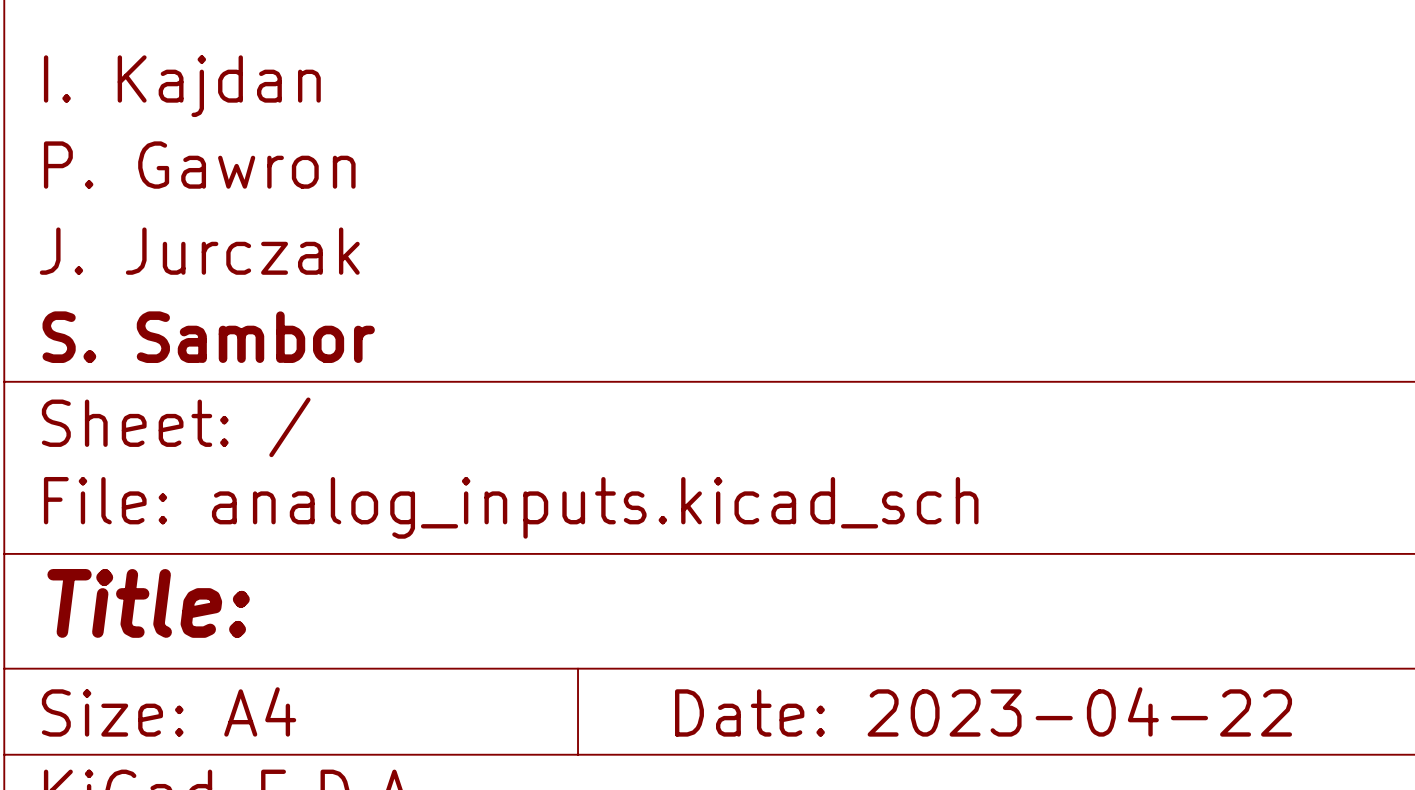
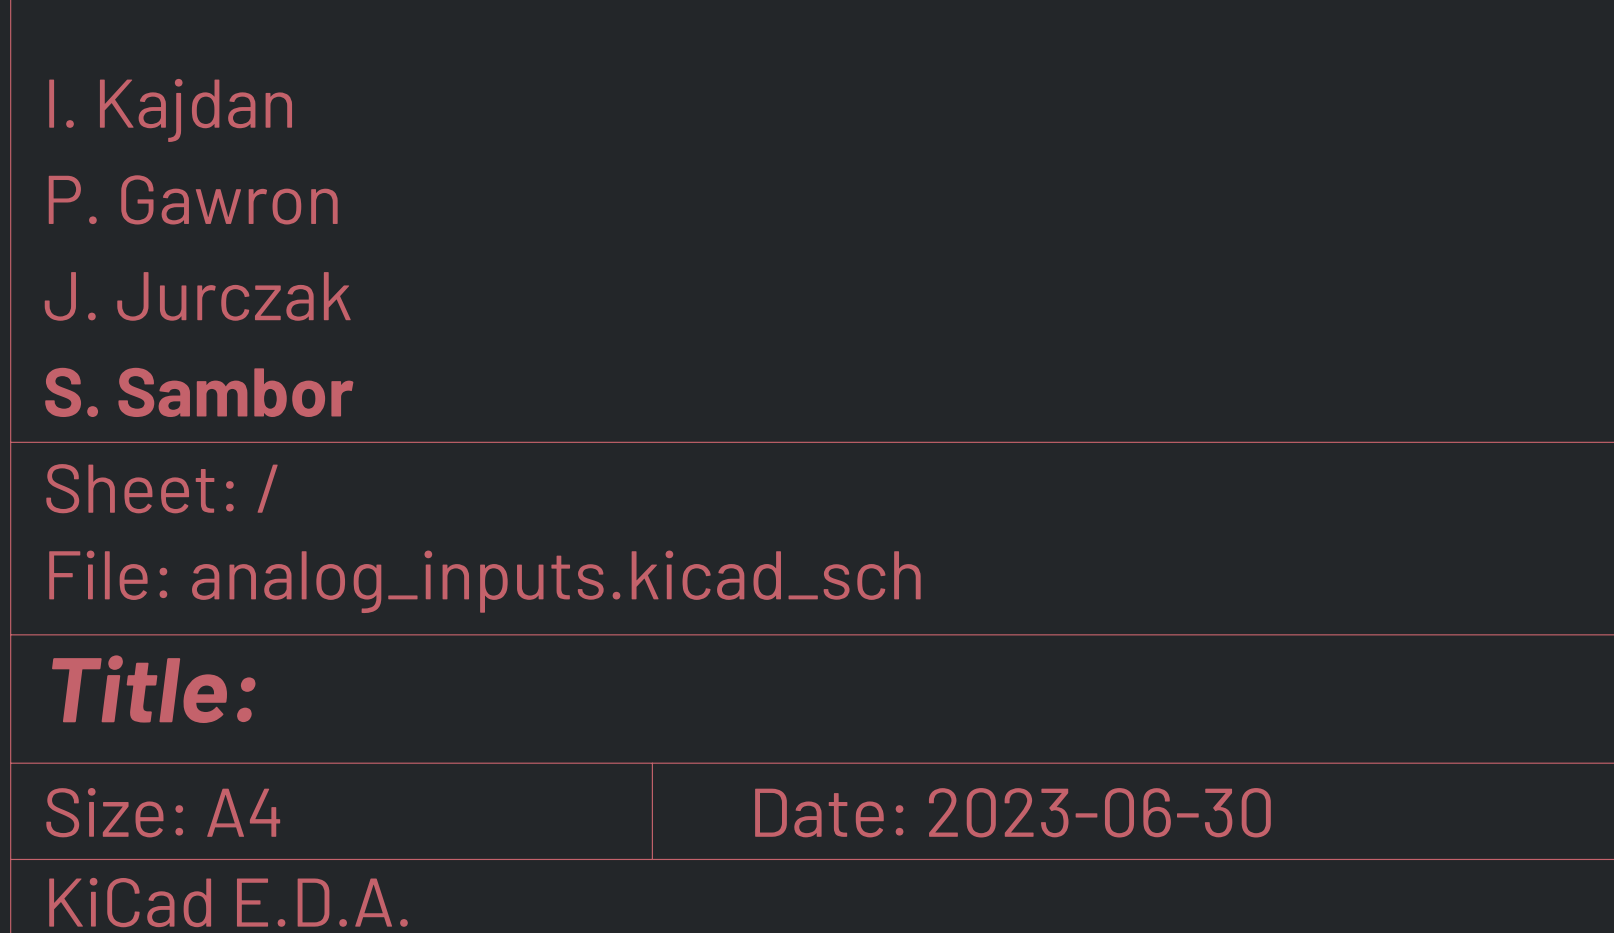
title block: Date: 2023-04-22 (983, 711) -> Date: 2023-06-30 (1012, 812)

